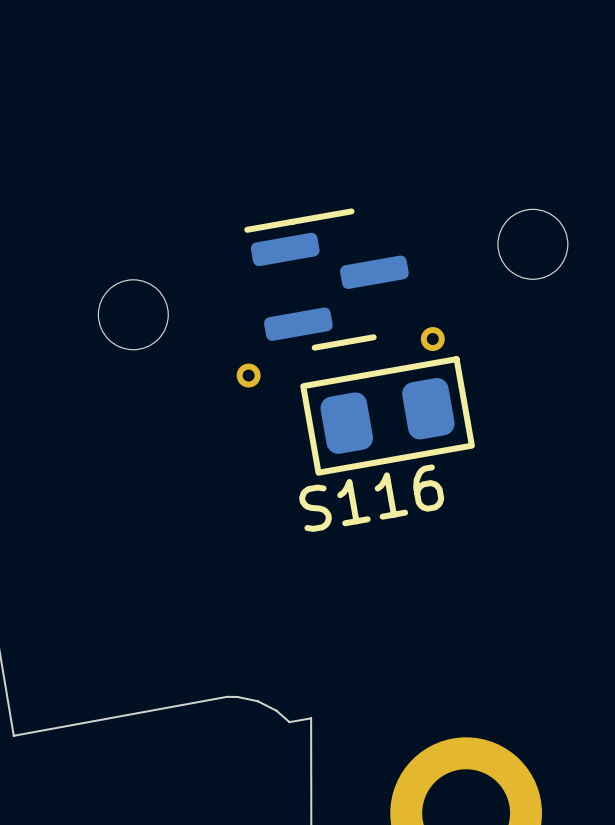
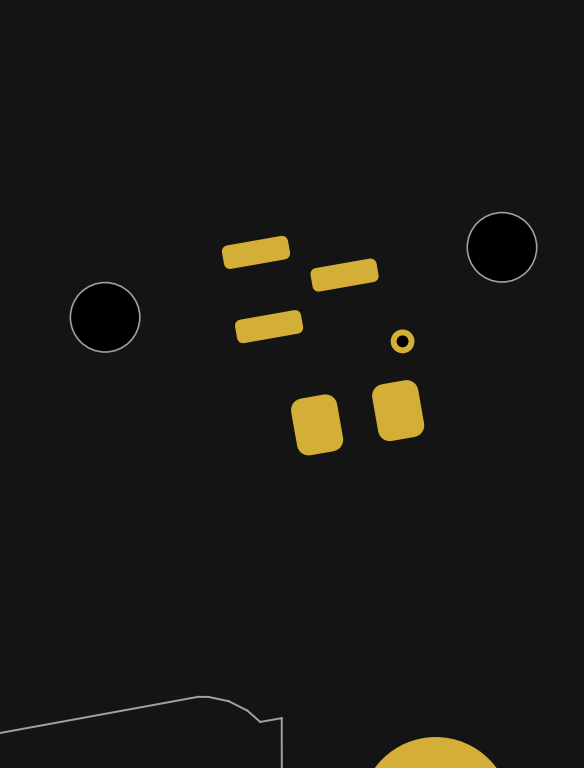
S116: (333, 342) -> none

